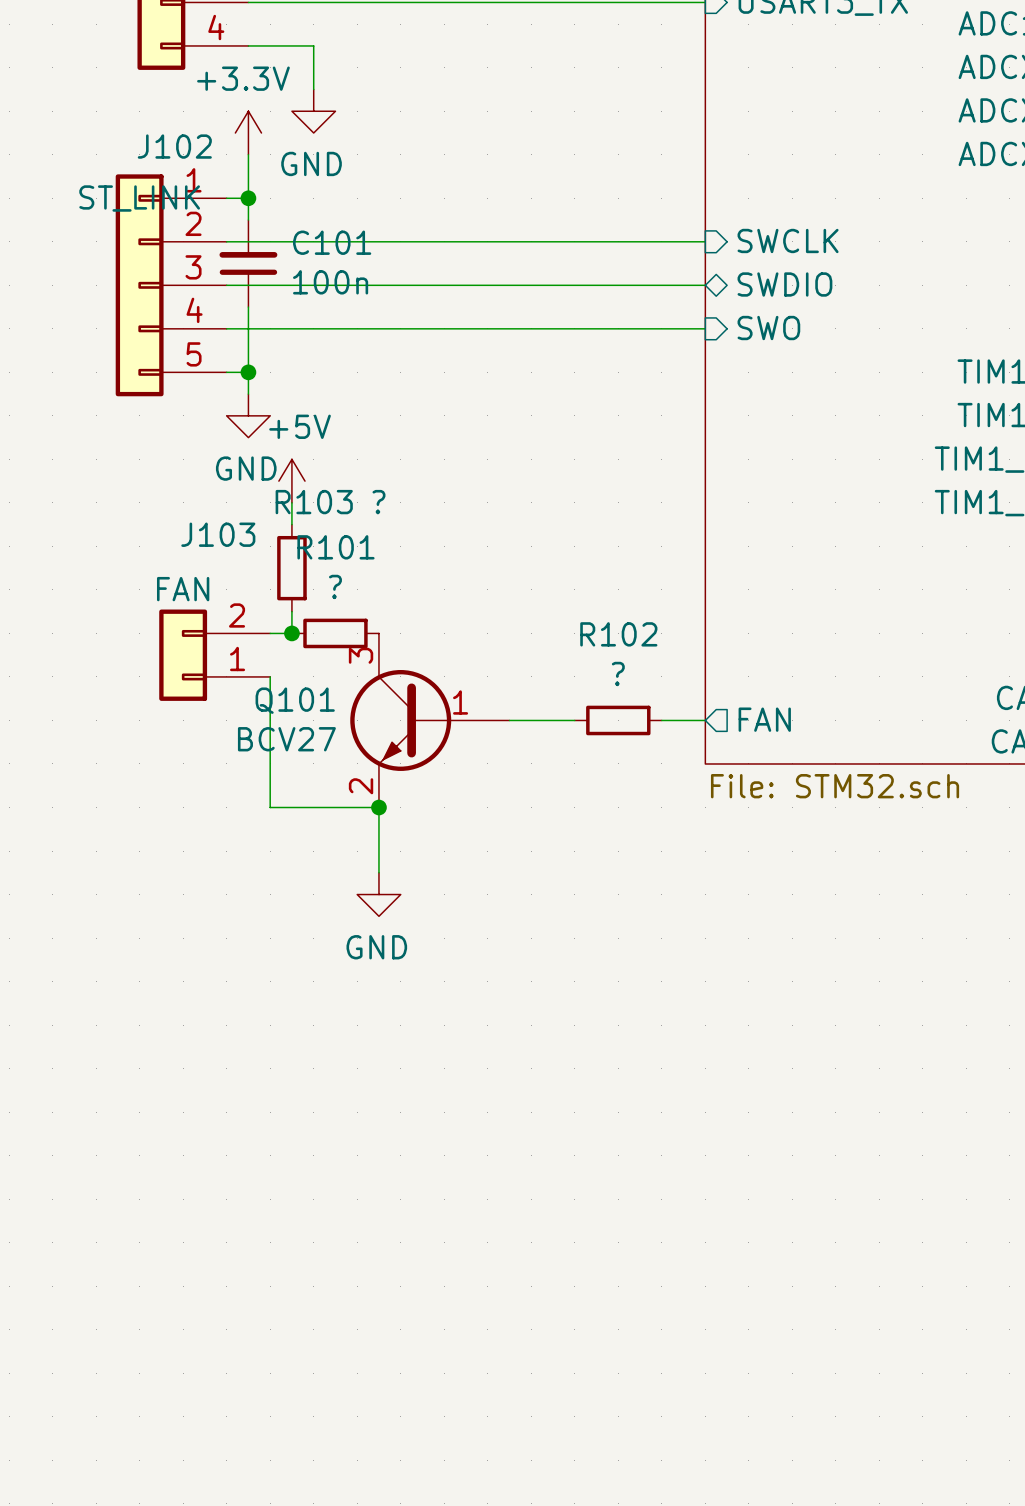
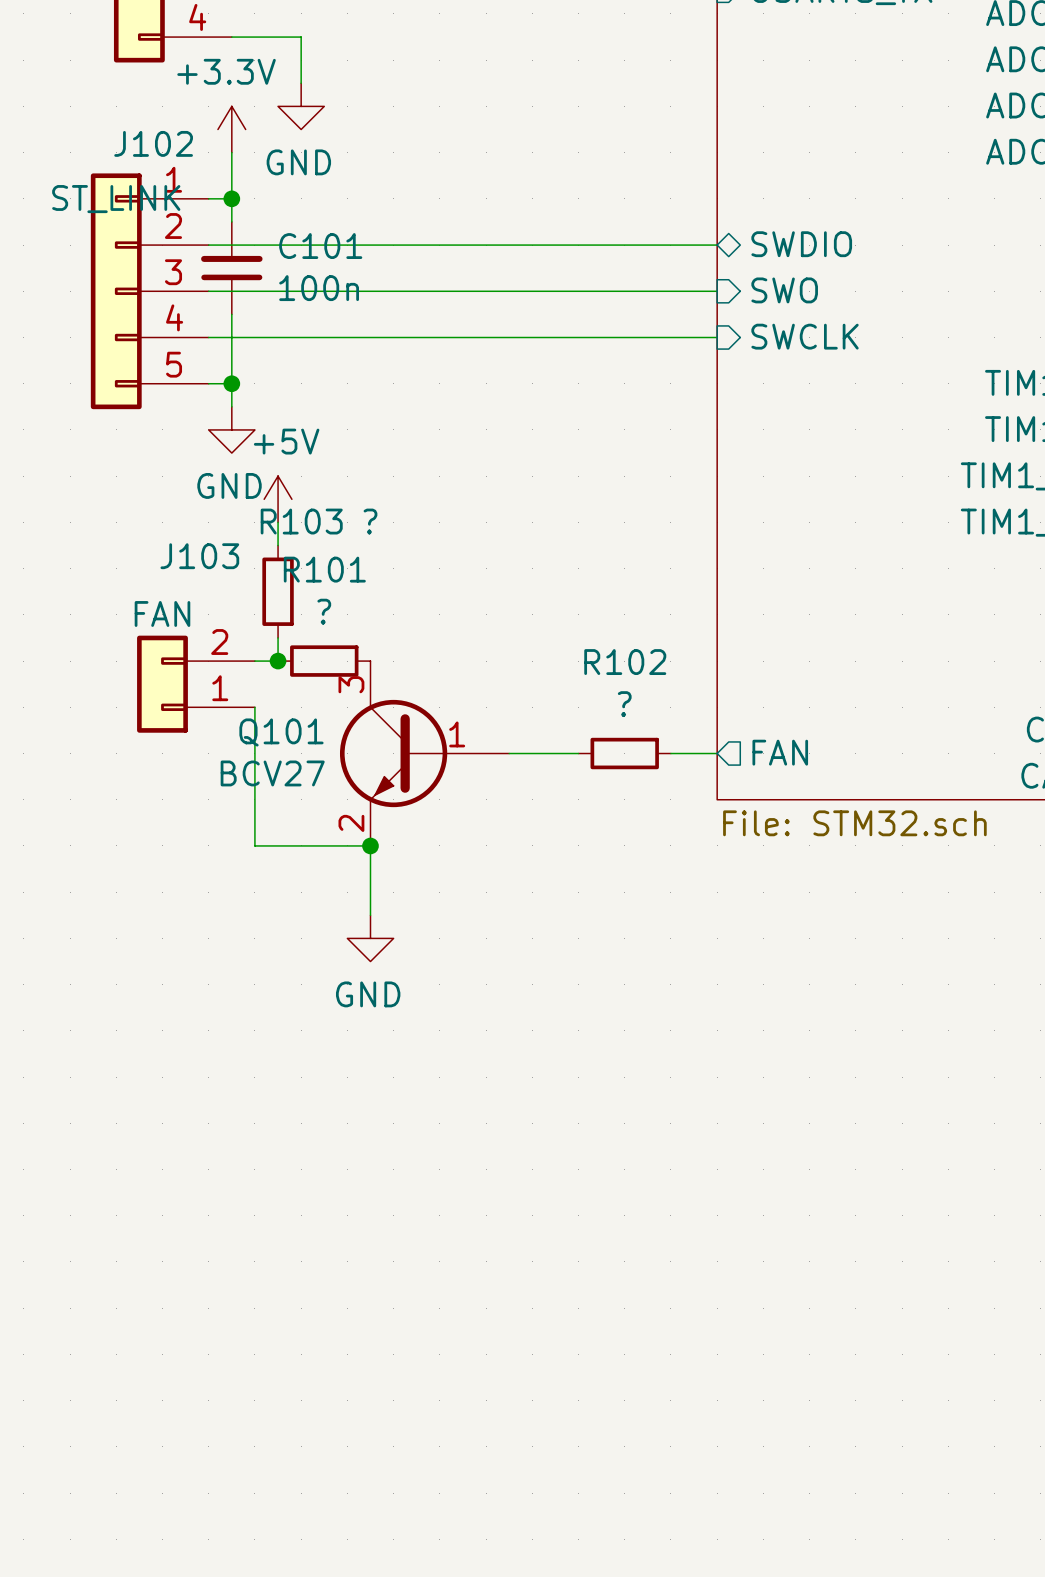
sheet pin shape: input (788, 240) -> bidirectional (801, 244)
sheet pin: SWCLK (788, 240) -> SWDIO (801, 244)
sheet pin shape: bidirectional (784, 284) -> input (784, 290)
sheet pin: SWDIO (784, 284) -> SWO (784, 290)
sheet pin: SWO (768, 328) -> SWCLK (805, 336)

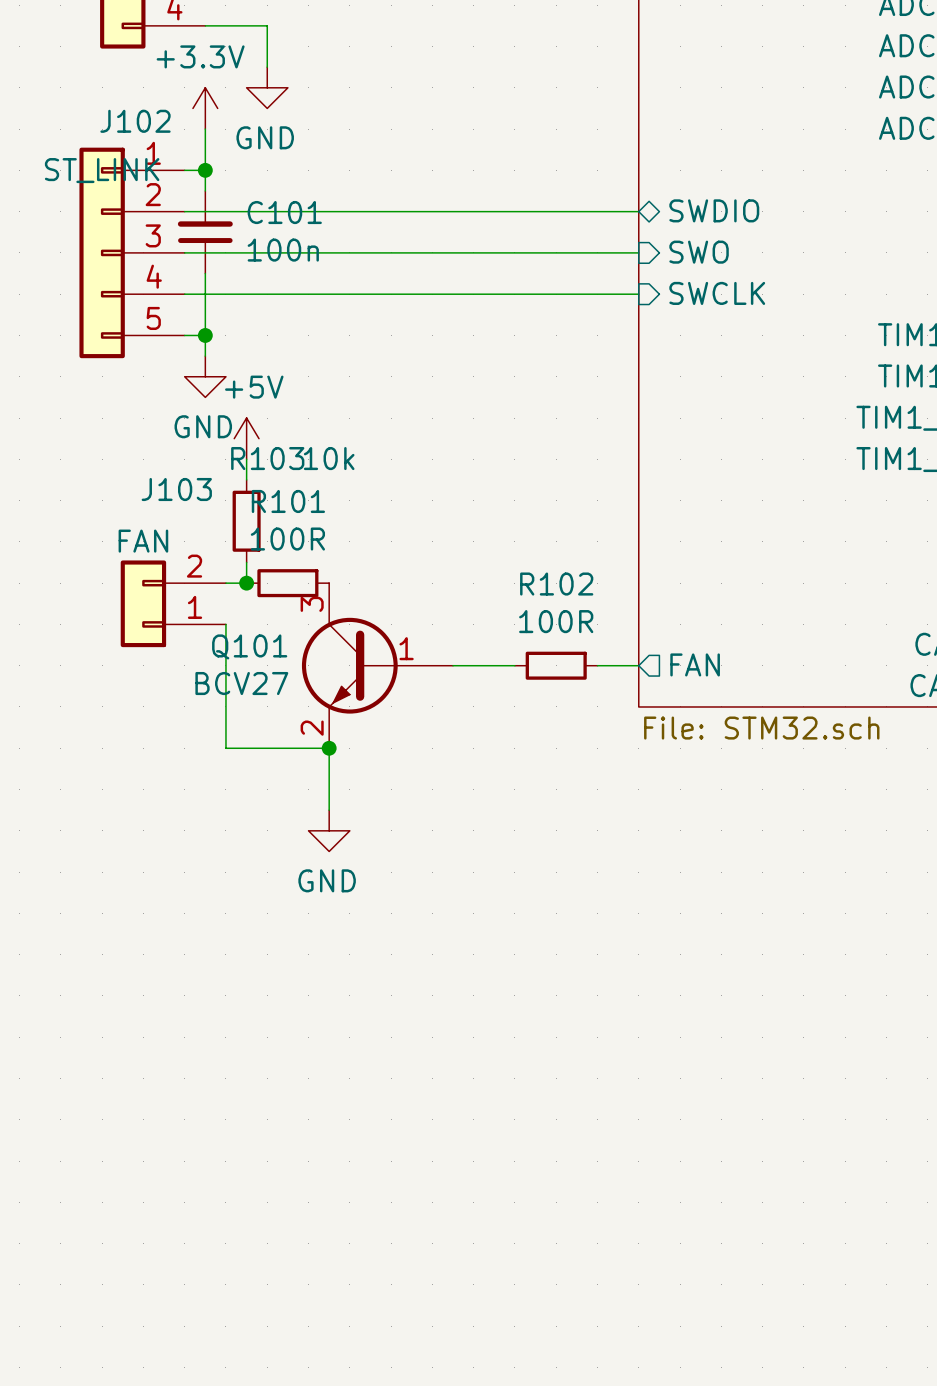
R103 value: ? (370, 521) -> 10k (329, 458)
R101 value: ? (324, 611) -> 100R (287, 539)
R102 value: ? (624, 704) -> 100R (556, 621)

